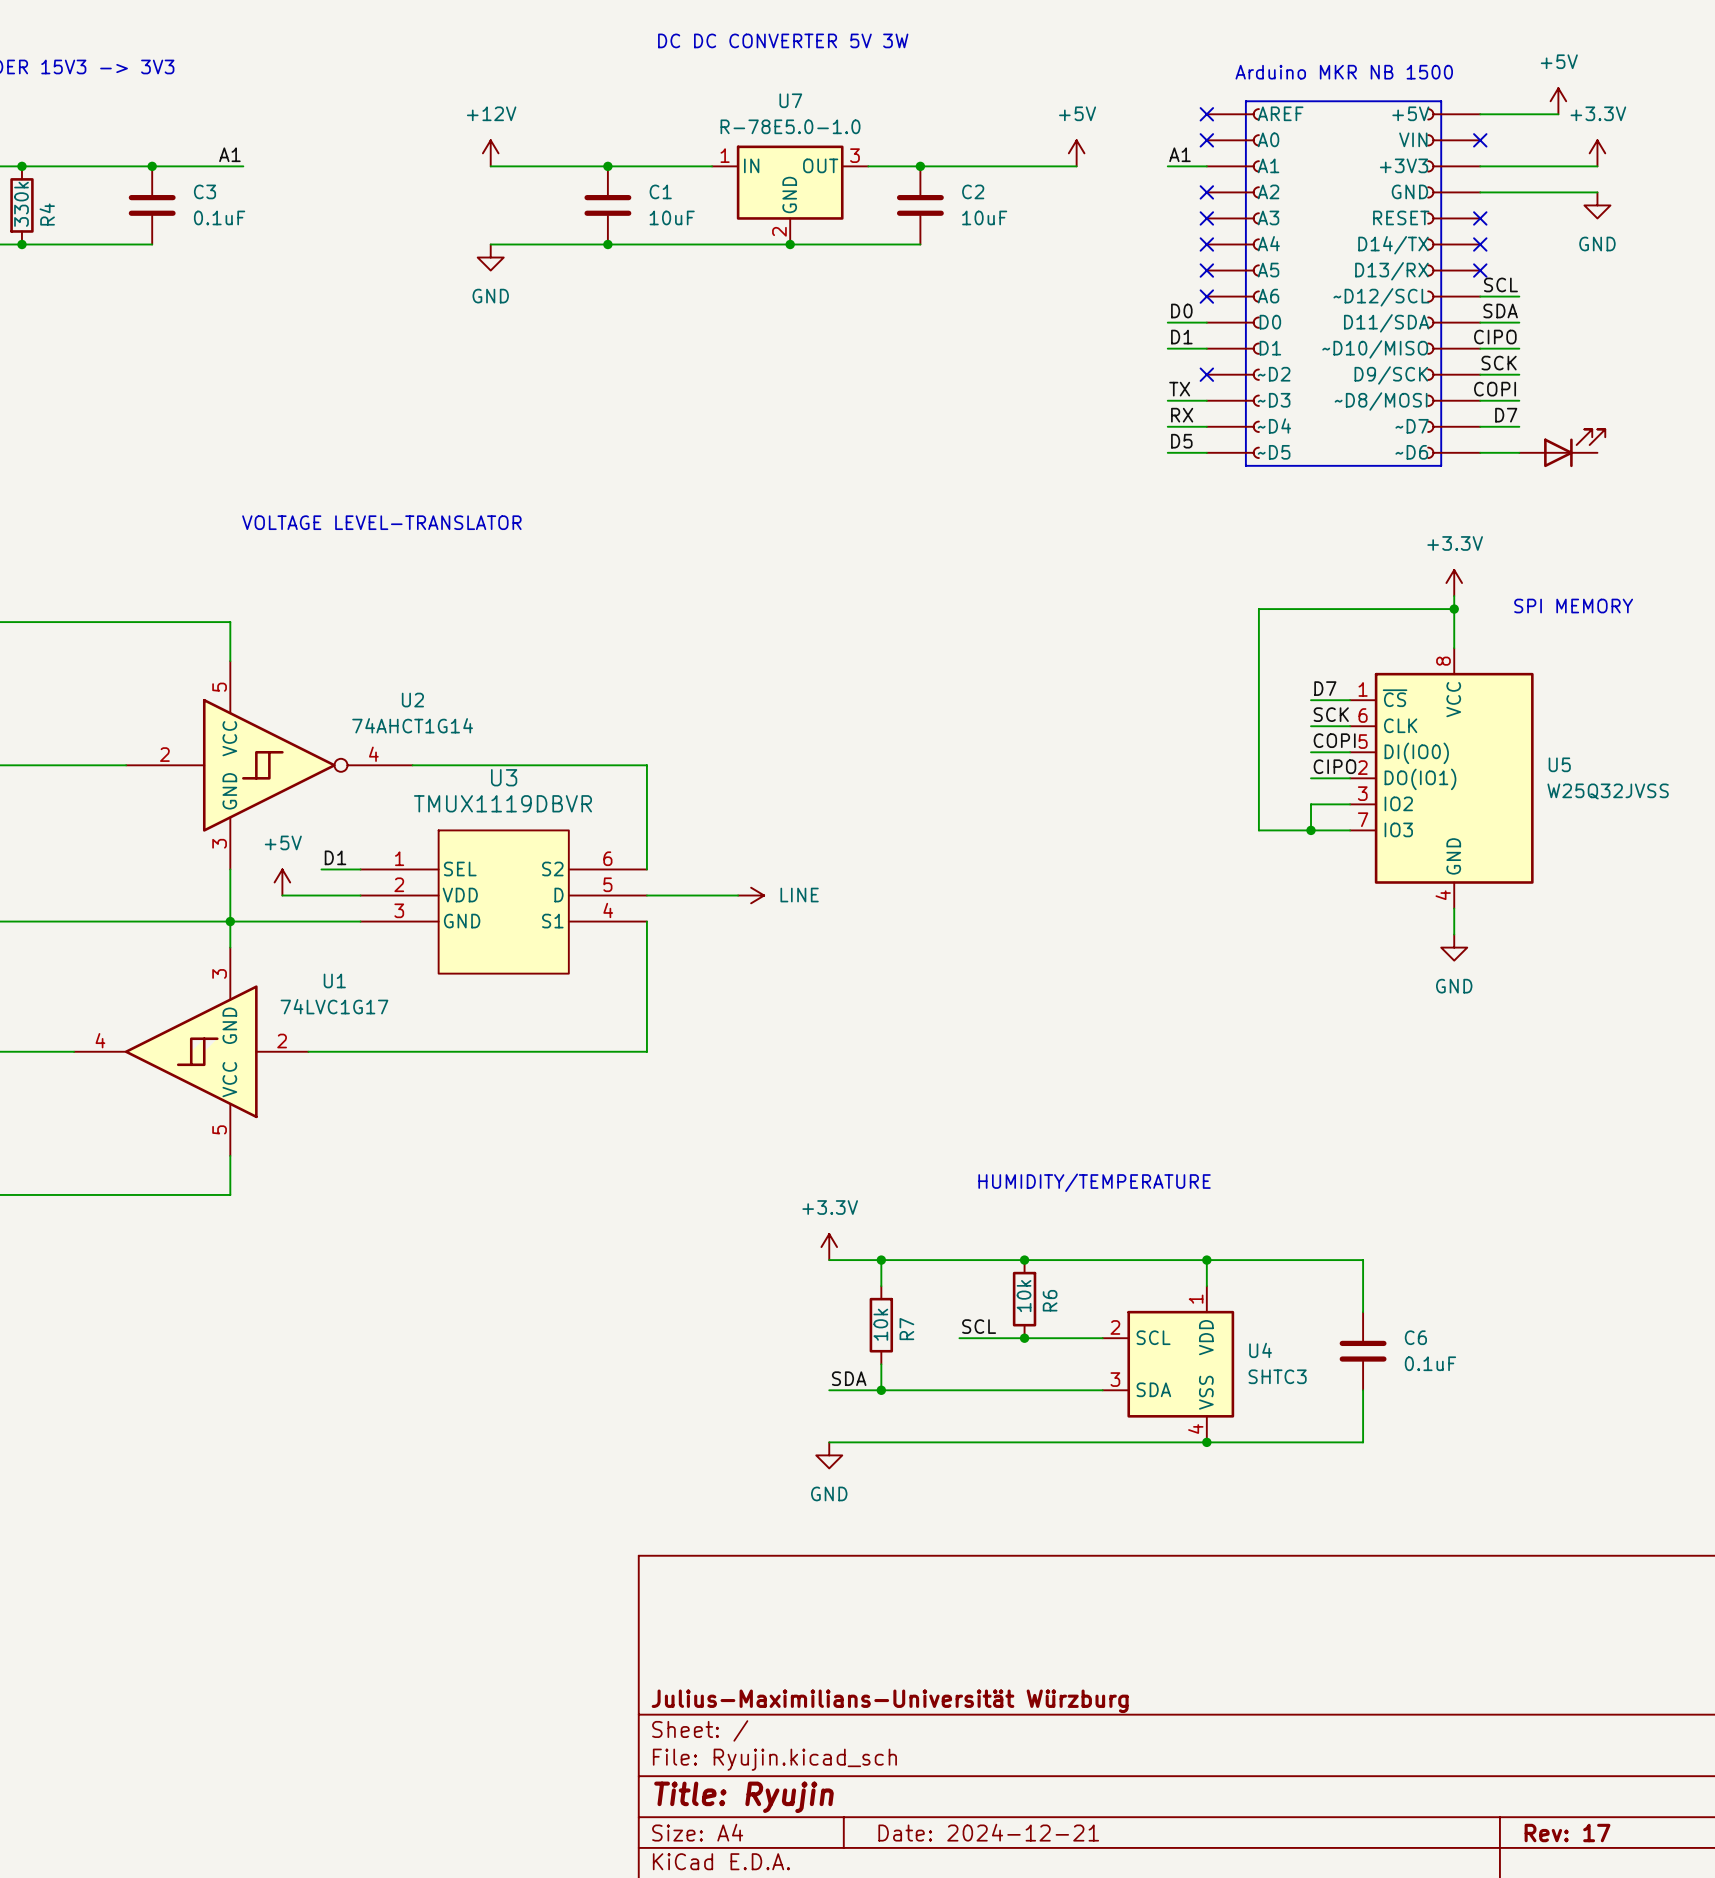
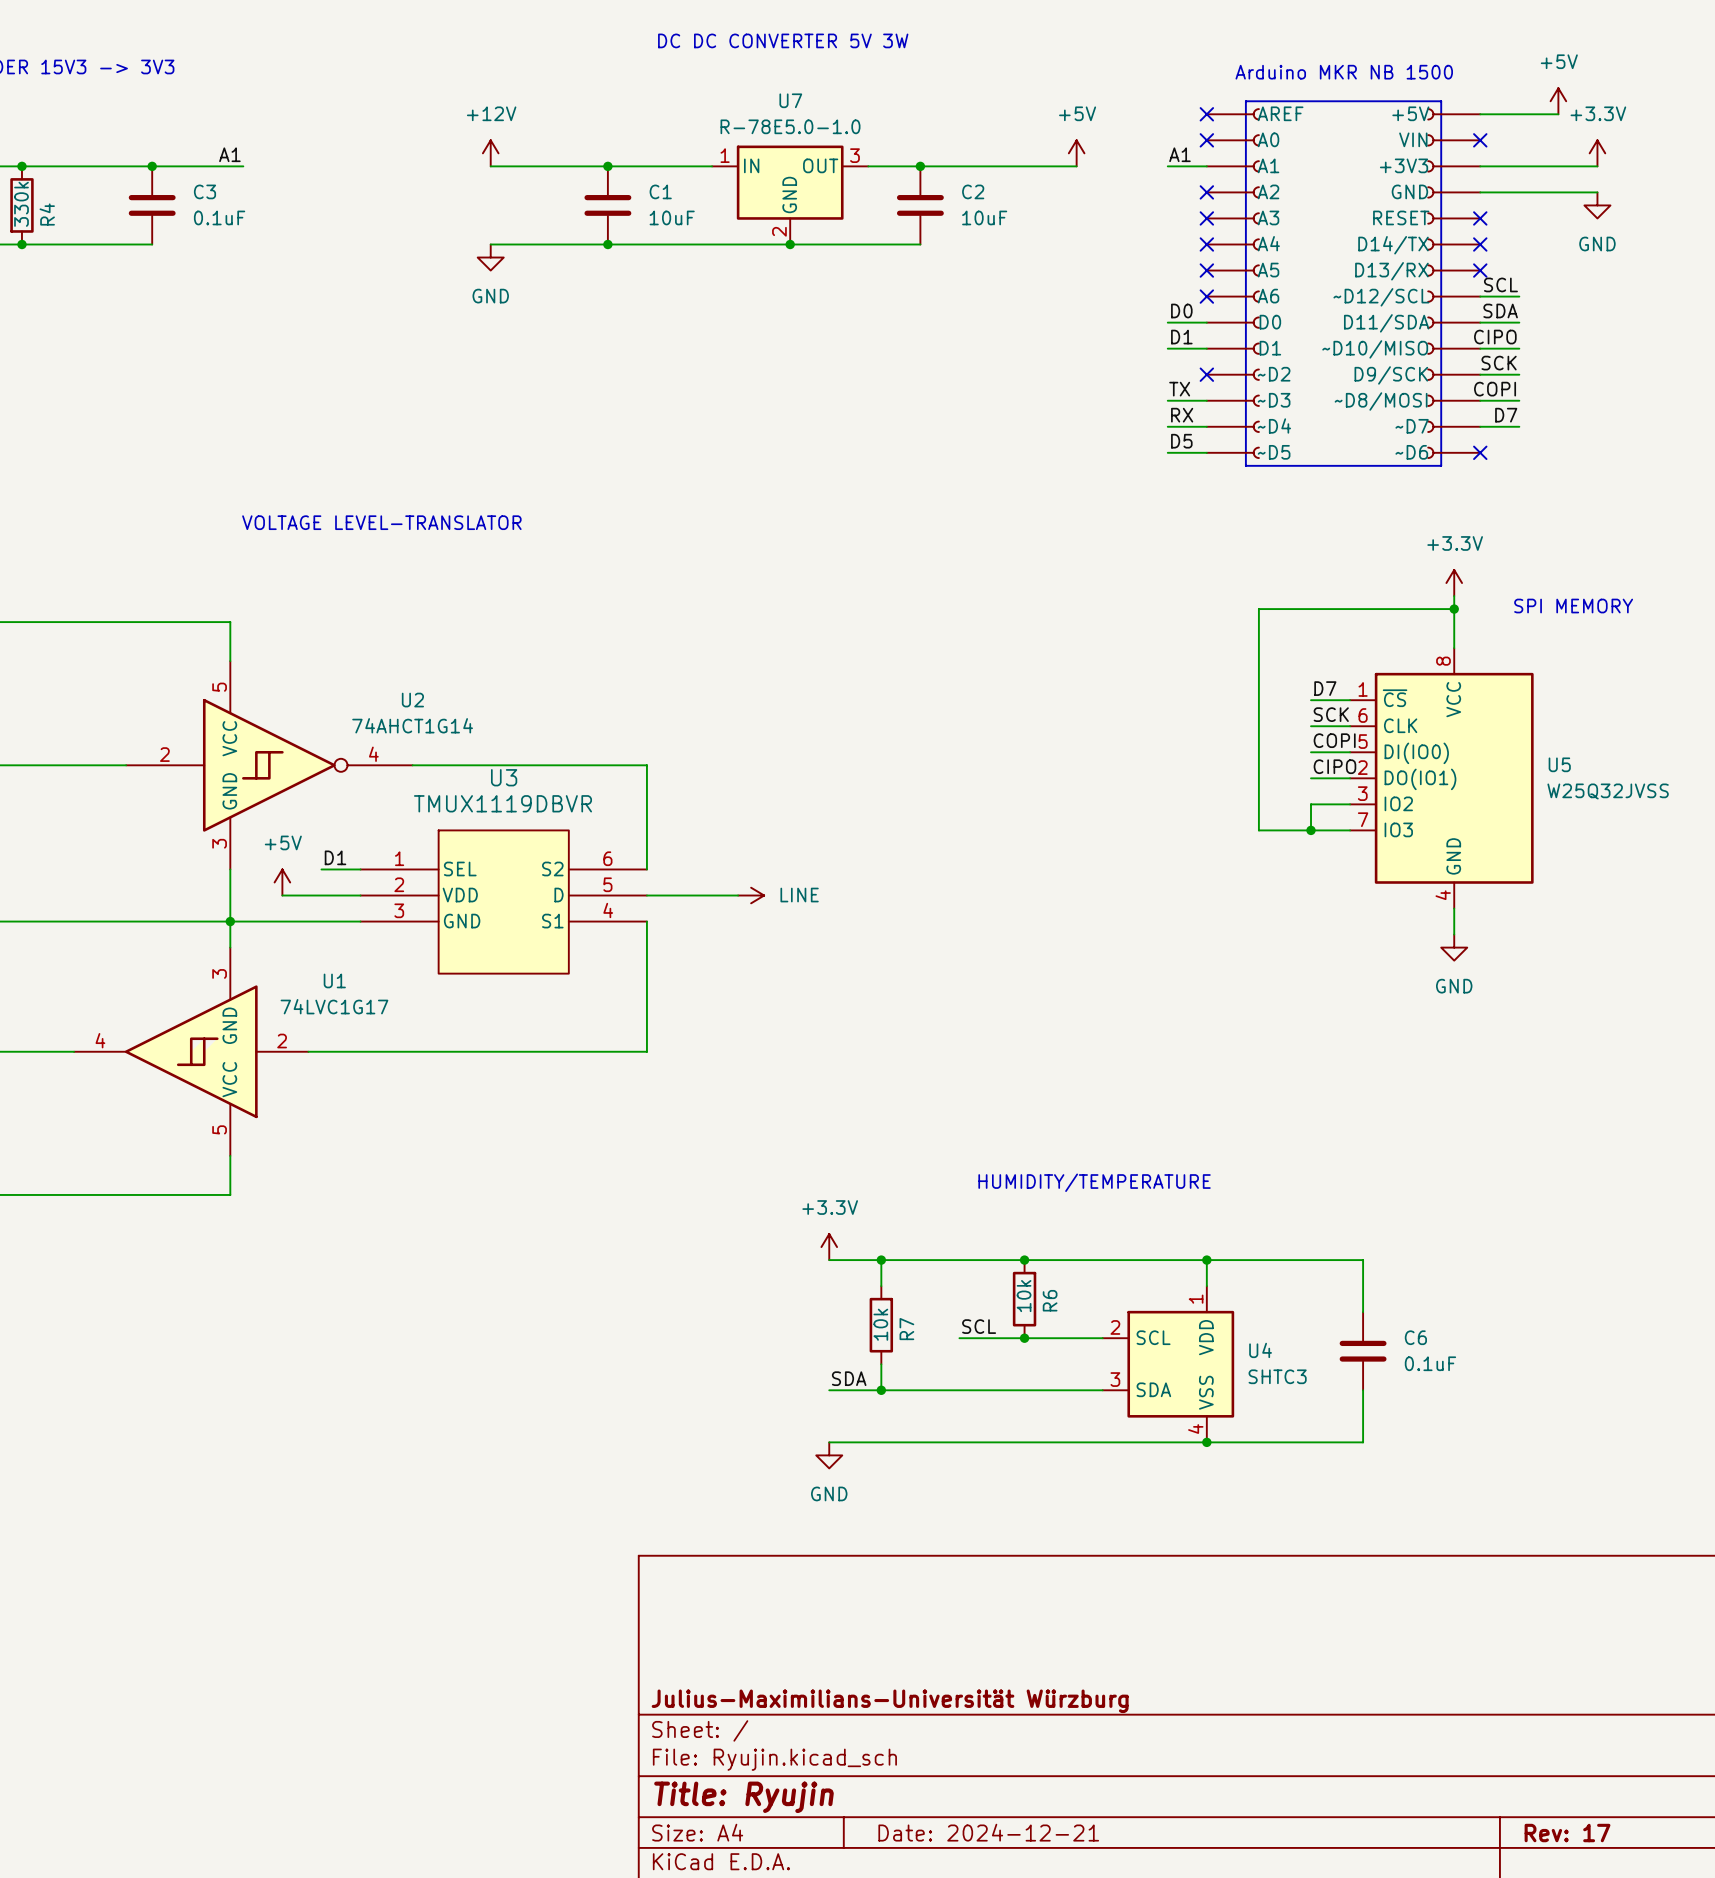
part: (1562, 448) -> none
wire: (1480, 452) (1519, 452) -> none
no-connect mark: none -> (1480, 452)

